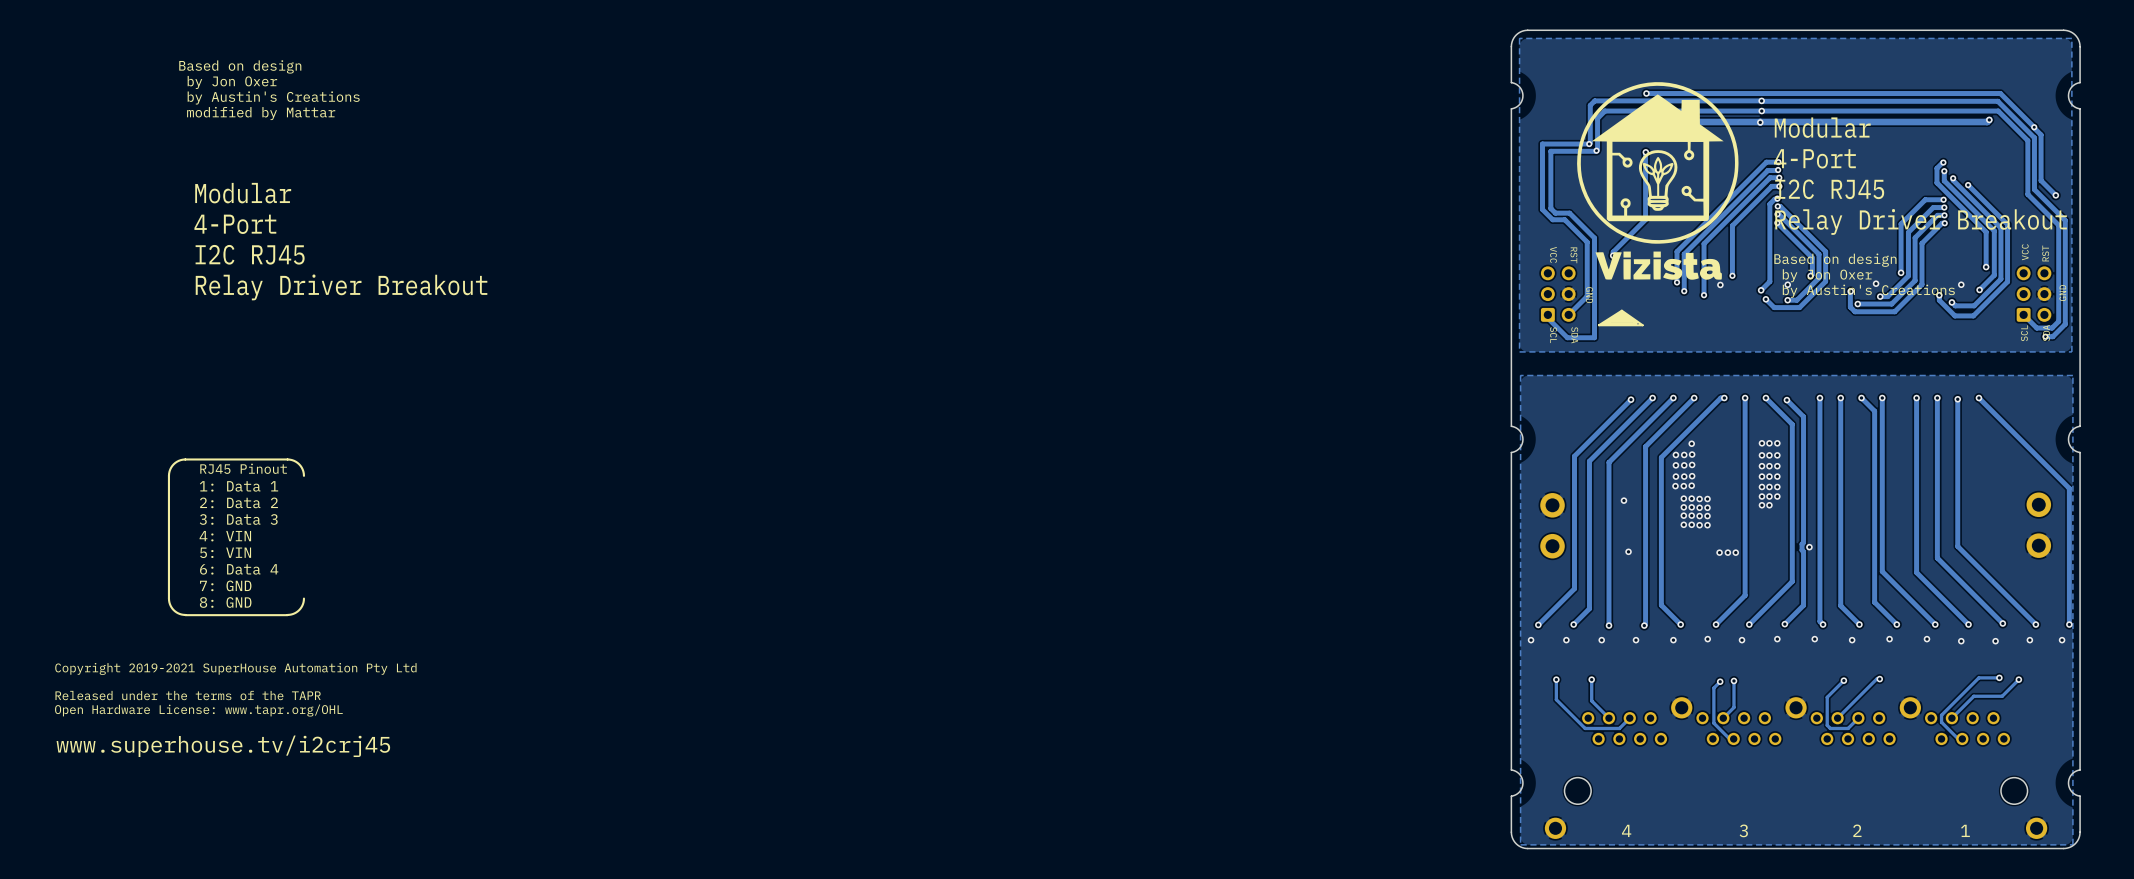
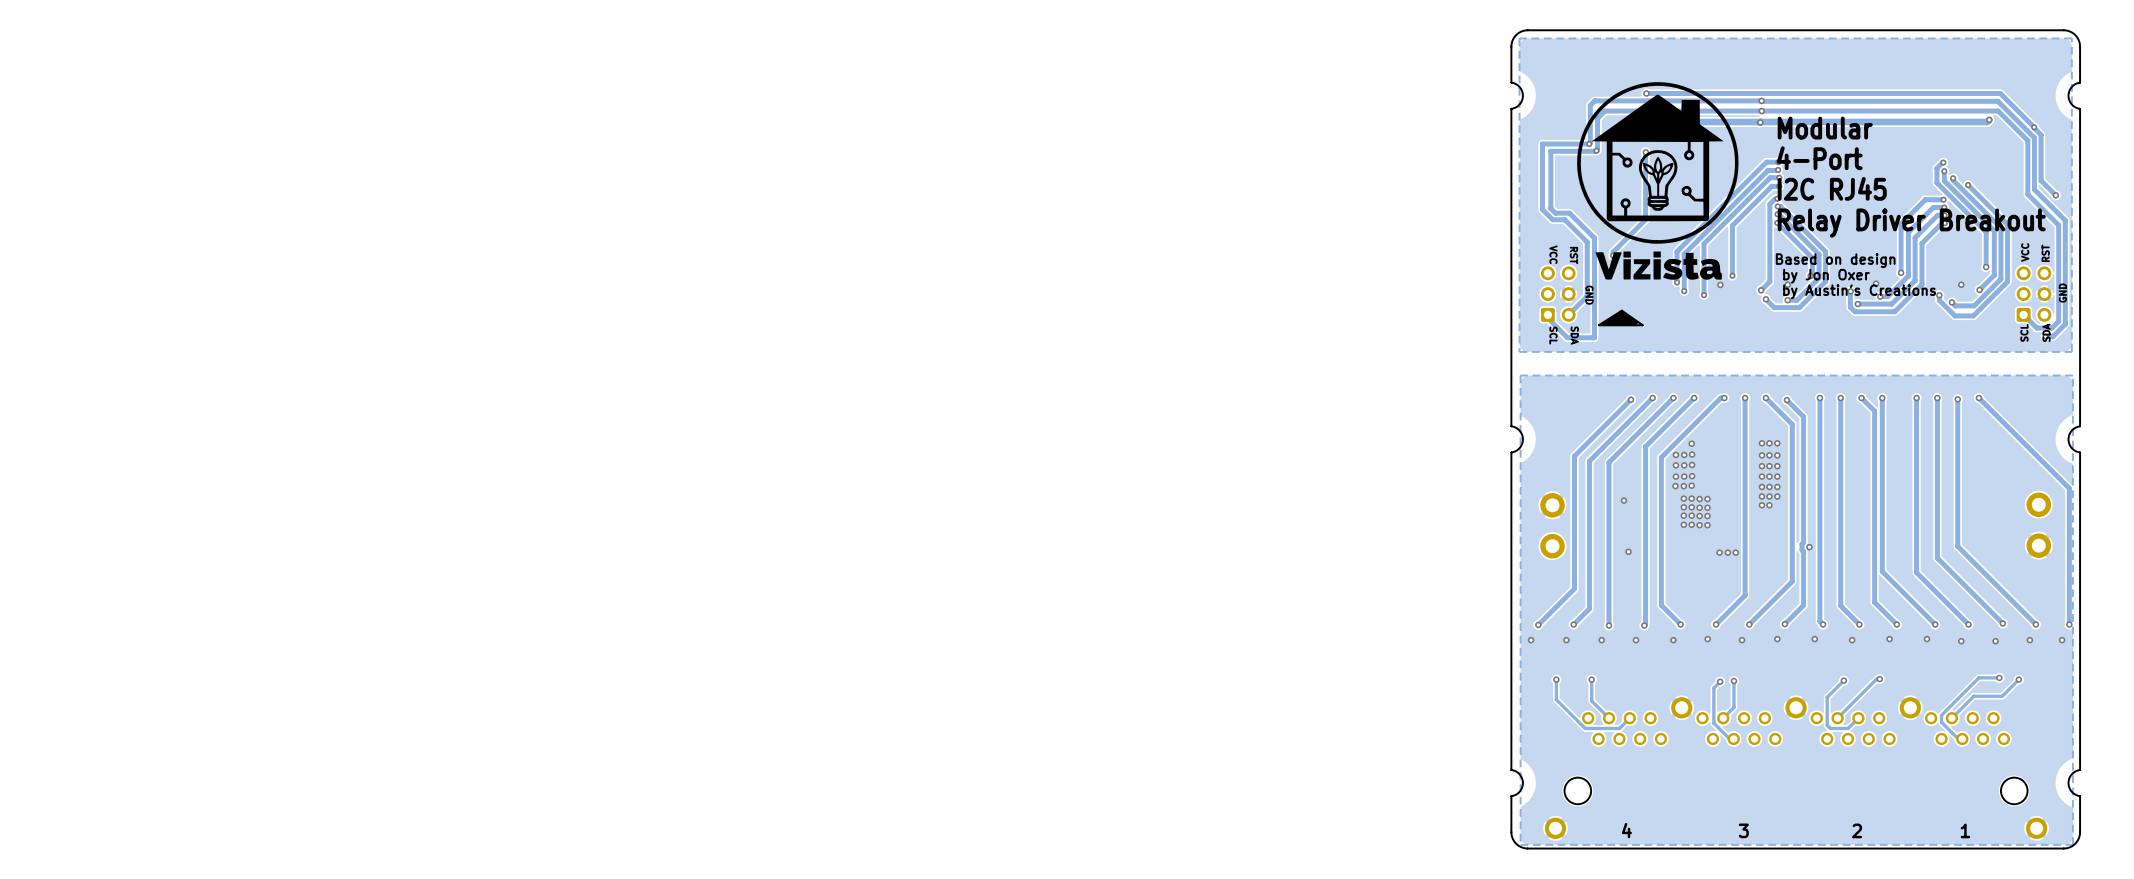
text: Based on design (240, 66) -> none
text: by Jon Oxer (232, 82) -> none
text: by Austin's Creations (273, 97) -> none
text: modified by Mattar (261, 113) -> none
text: Modular (243, 193) -> none
text: 4-Port (235, 224) -> none
text: I2C RJ45 (250, 254) -> none
text: Relay Driver Breakout (341, 287) -> none
text: RJ45 Pinout (243, 468) -> none
line: (303, 475) (299, 464) (289, 459) (185, 459) (179, 460) (172, 465) (168, 475) (169, 600) (173, 610) (185, 614) -> none
text: 1: Data 1 (239, 486) -> none
text: 2: Data 2 (238, 502) -> none
text: 3: Data 3 (238, 519) -> none
text: 4: VIN (225, 536) -> none
text: 5: VIN (225, 552) -> none
text: 6: Data 4 (239, 569) -> none
text: 7: GND (225, 585) -> none
line: (303, 598) (299, 610) (287, 614) -> none
text: 8: GND (225, 602) -> none
line: (287, 615) (185, 615) -> none
text: Copyright 2019-2021 SuperHouse Automation Pty Ltd (235, 668) -> none
text: Released under the terms of the TAPR (188, 695) -> none
text: Open Hardware License: www.tapr.org/OHL (198, 710) -> none
text: www.superhouse.tv/i2crj45 (223, 746) -> none

